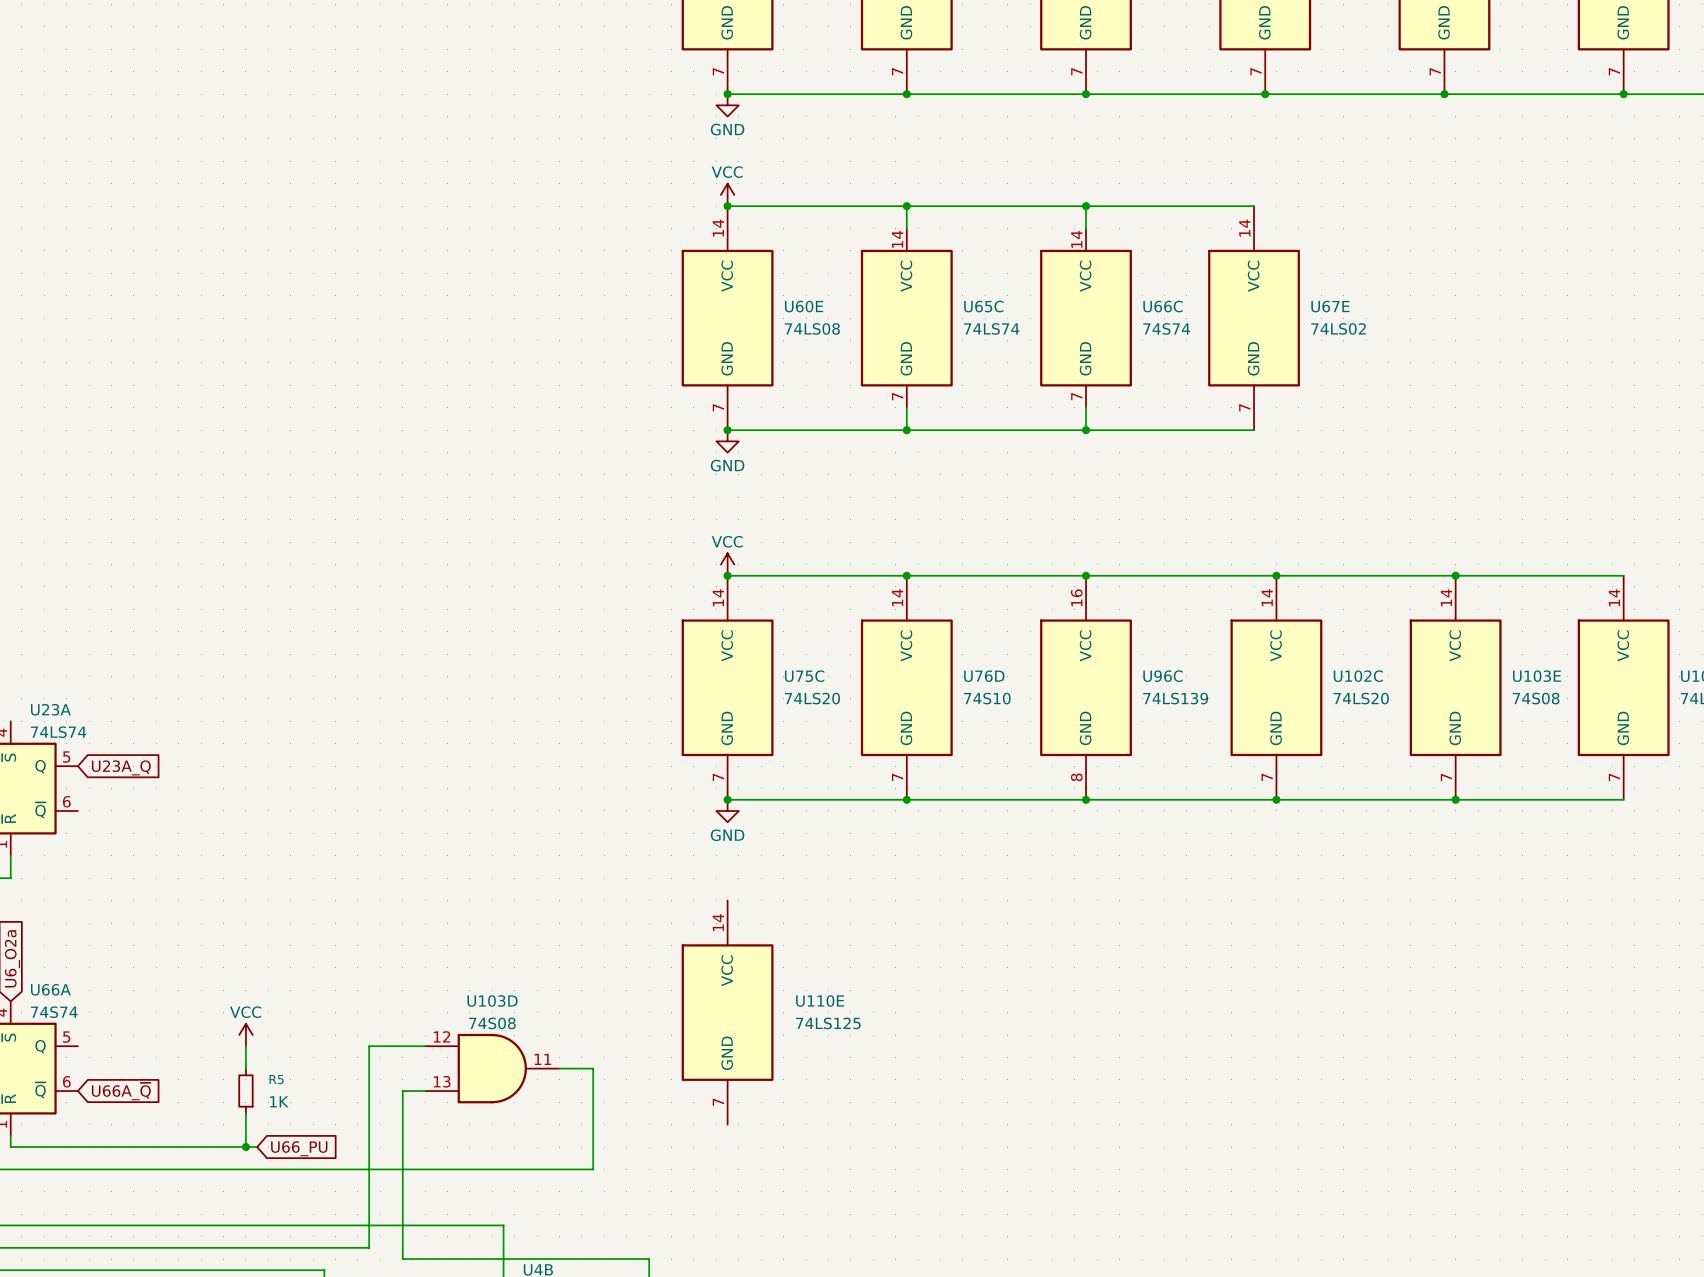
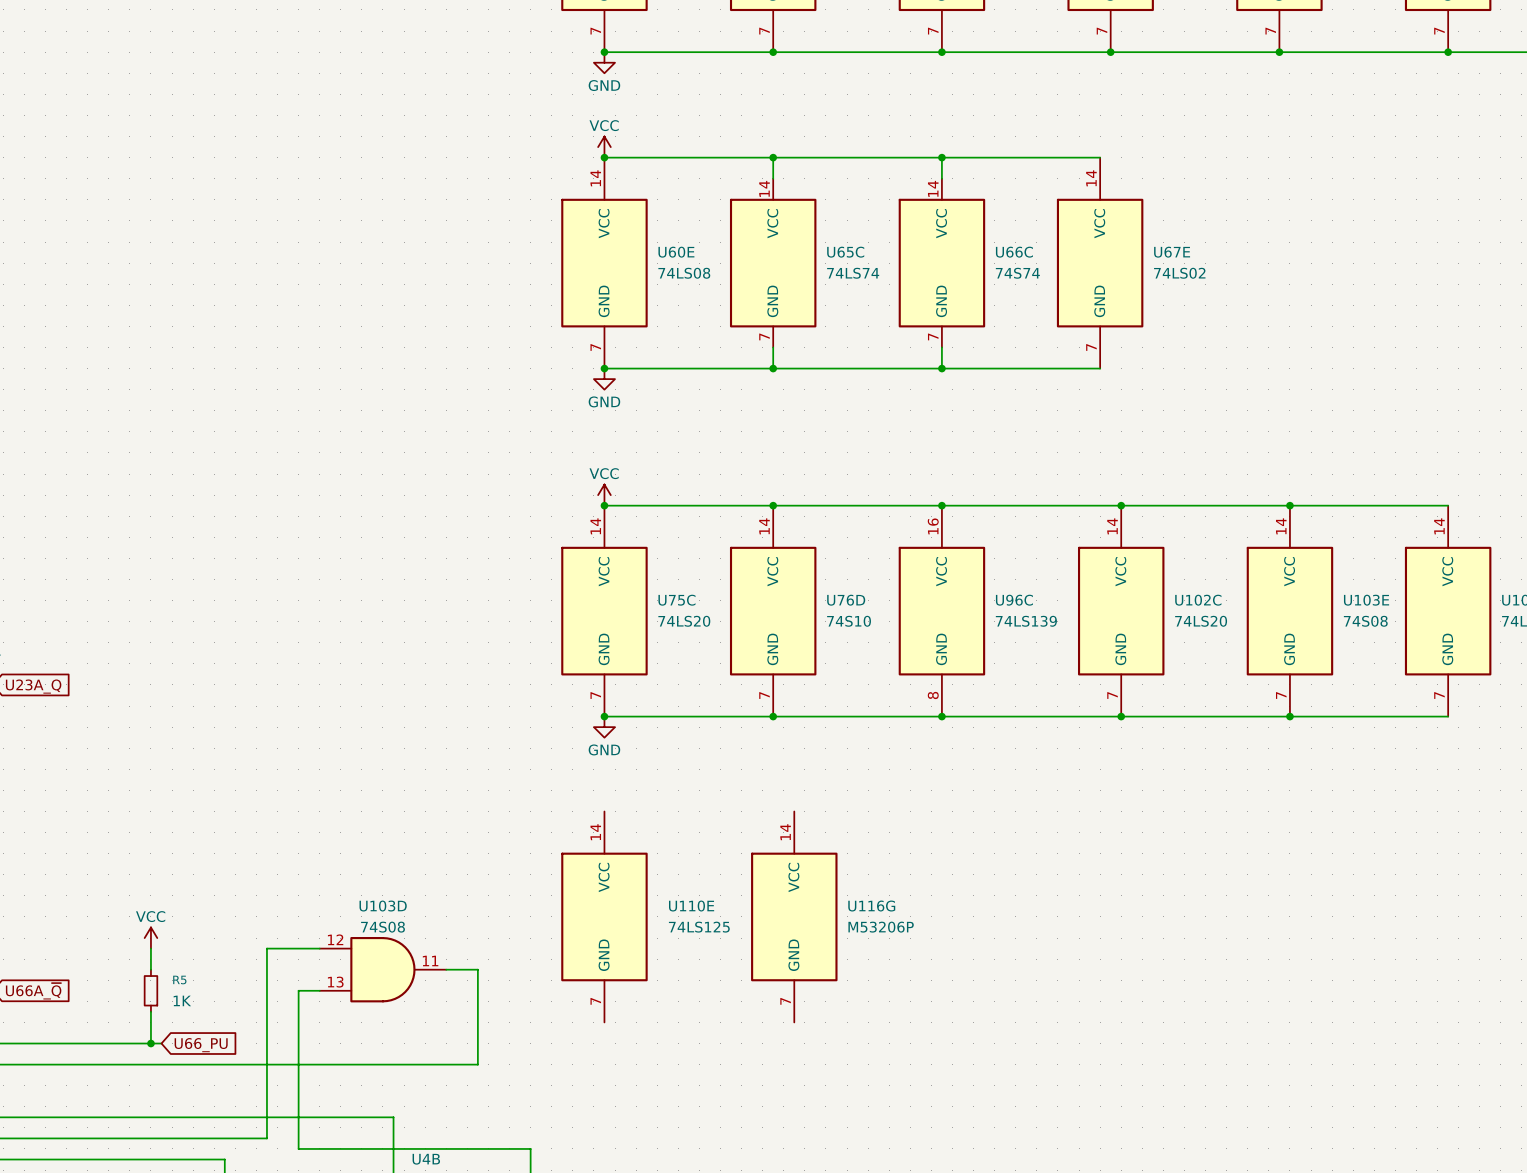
U116G: none -> M53206P (794, 916)

